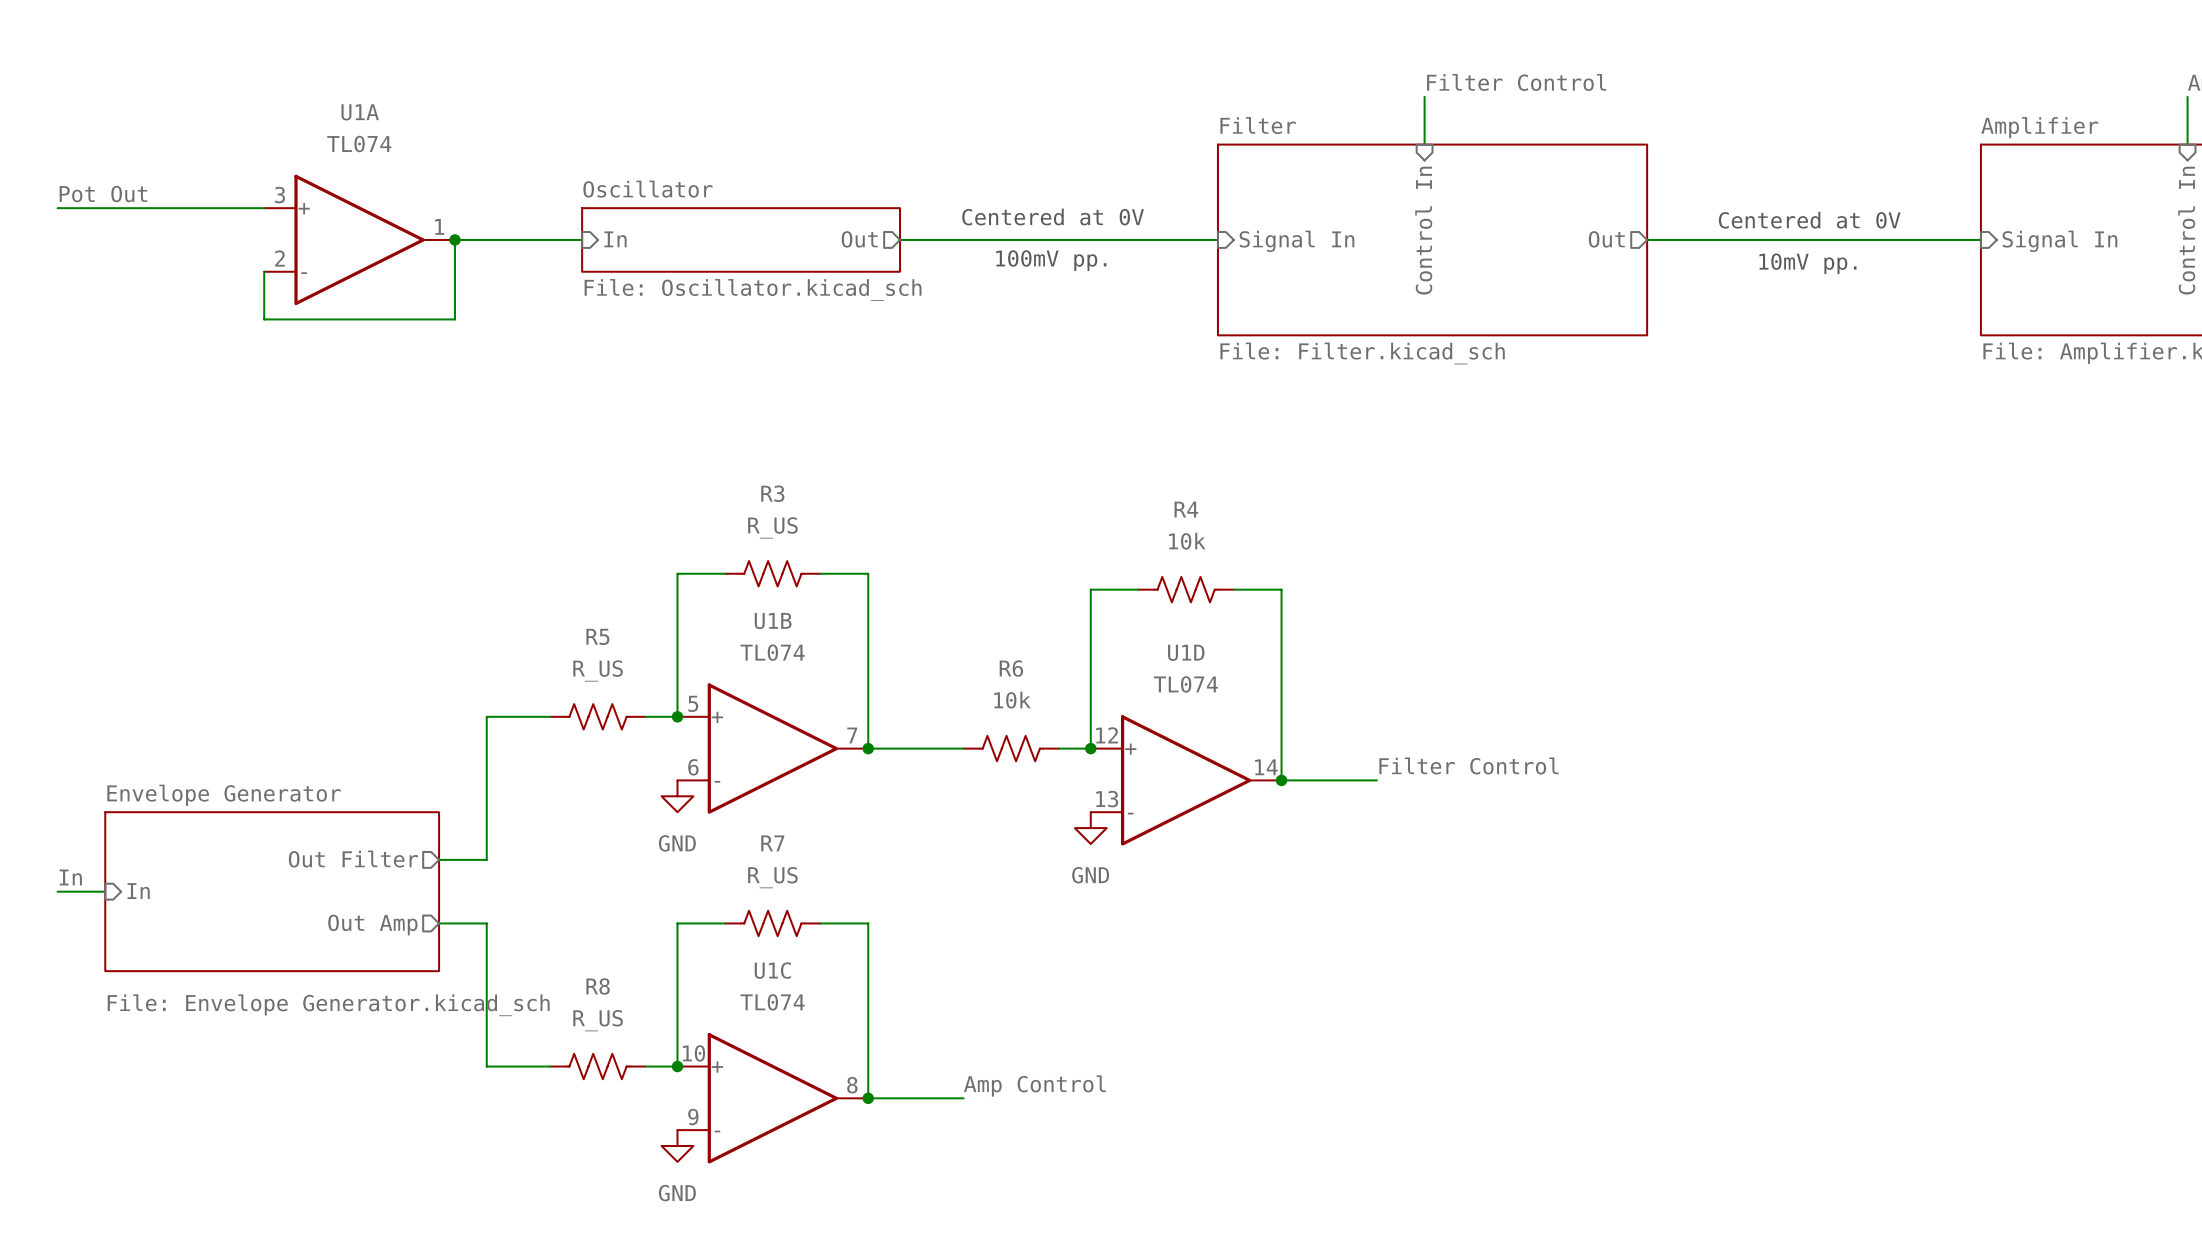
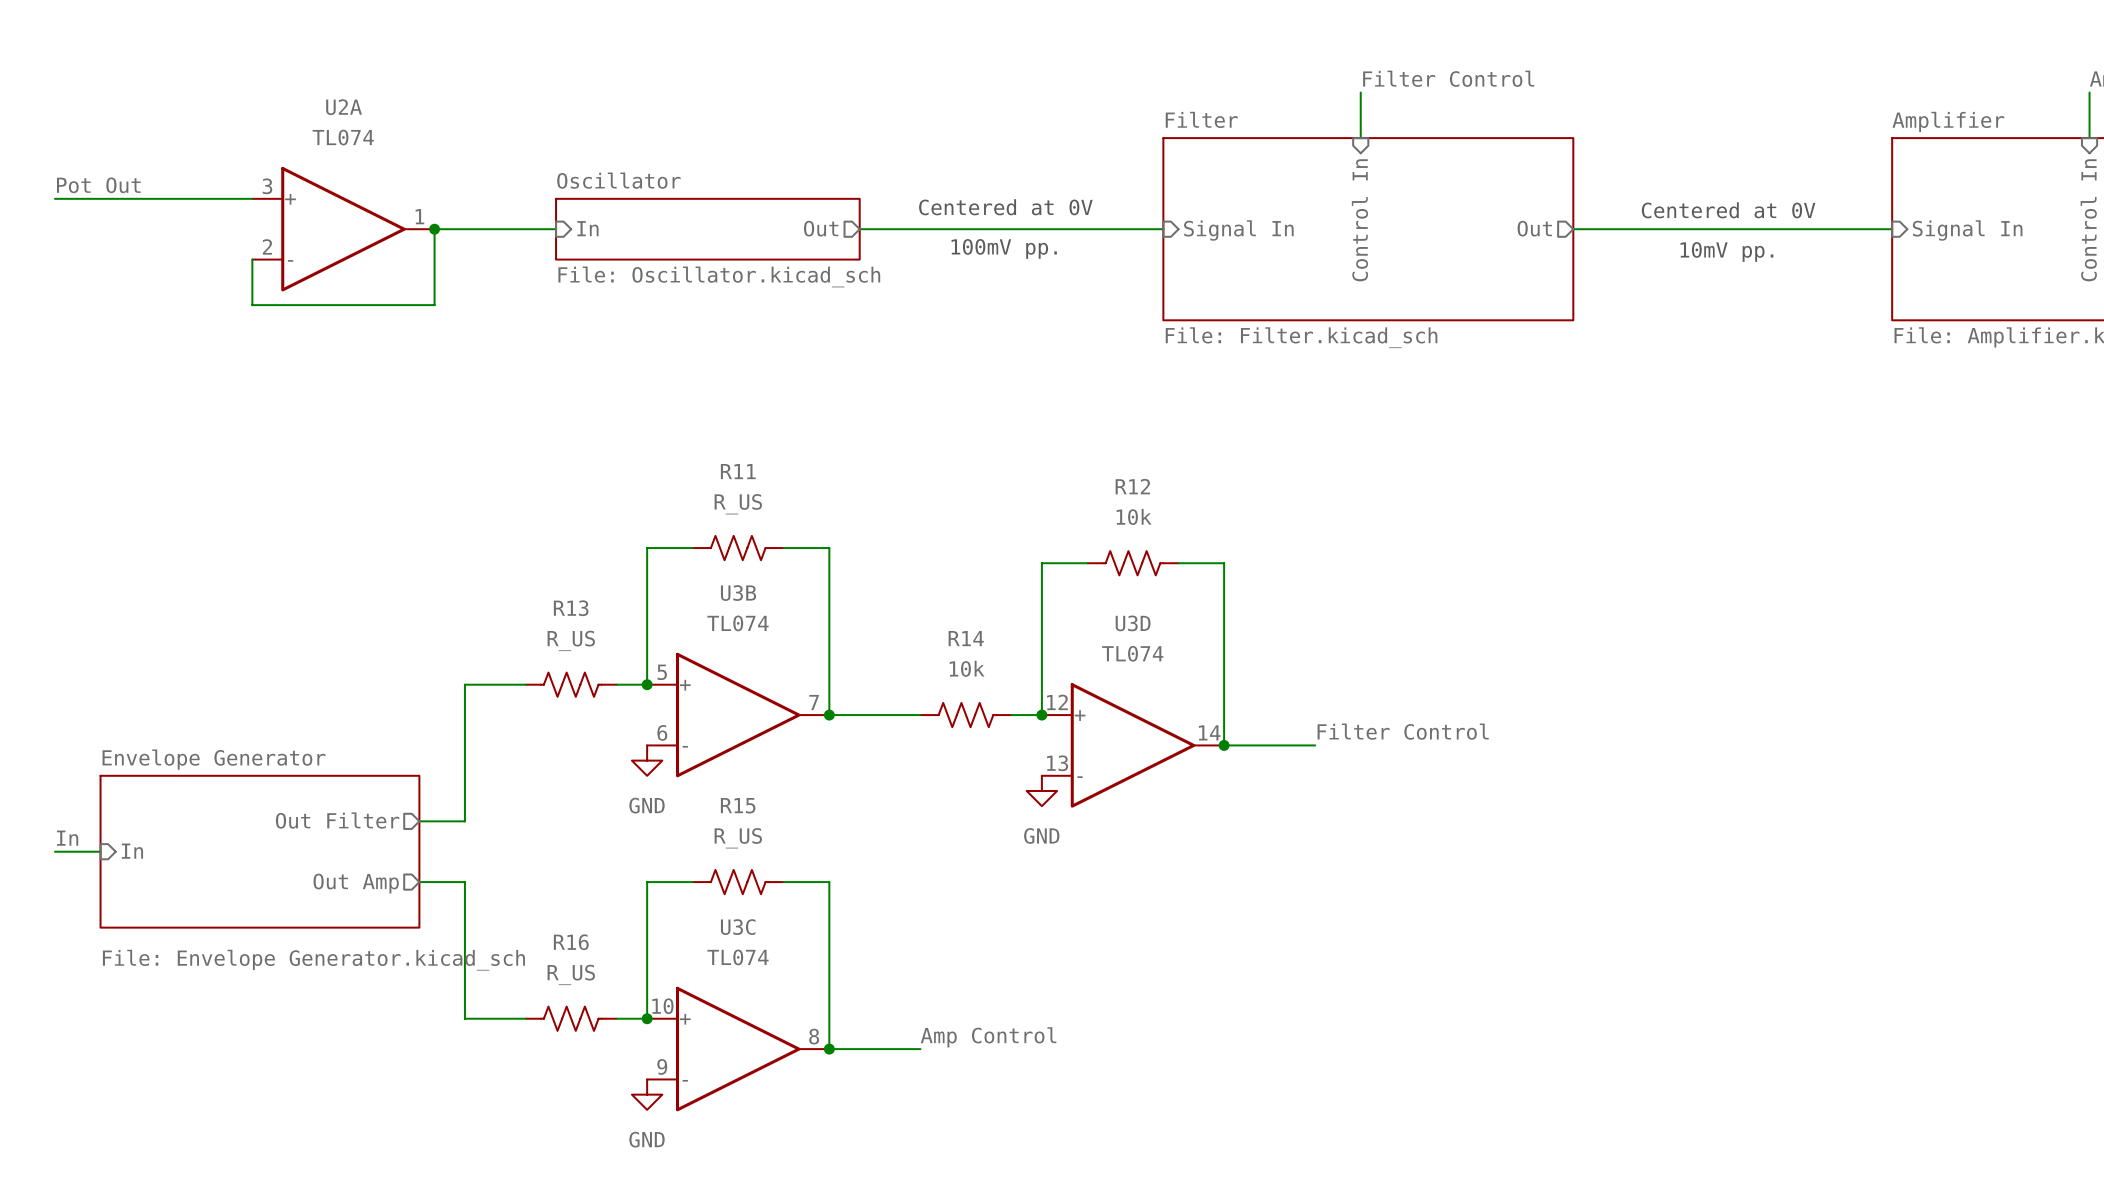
U1A name: U1A (360, 112) -> U2A (344, 107)
R3 name: R3 (772, 493) -> R11 (738, 471)
R4 name: R4 (1186, 509) -> R12 (1132, 486)
U1B name: U1B (773, 621) -> U3B (738, 593)
R5 name: R5 (597, 636) -> R13 (571, 608)
U1D name: U1D (1186, 652) -> U3D (1133, 623)
R6 name: R6 (1011, 668) -> R14 (966, 638)
R7 name: R7 (772, 843) -> R15 (738, 805)
U1C name: U1C (772, 970) -> U3C (738, 927)
R8 name: R8 (598, 986) -> R16 (571, 942)

